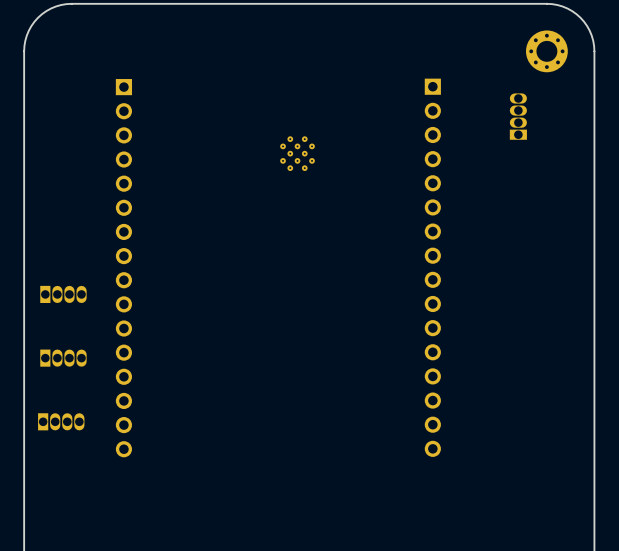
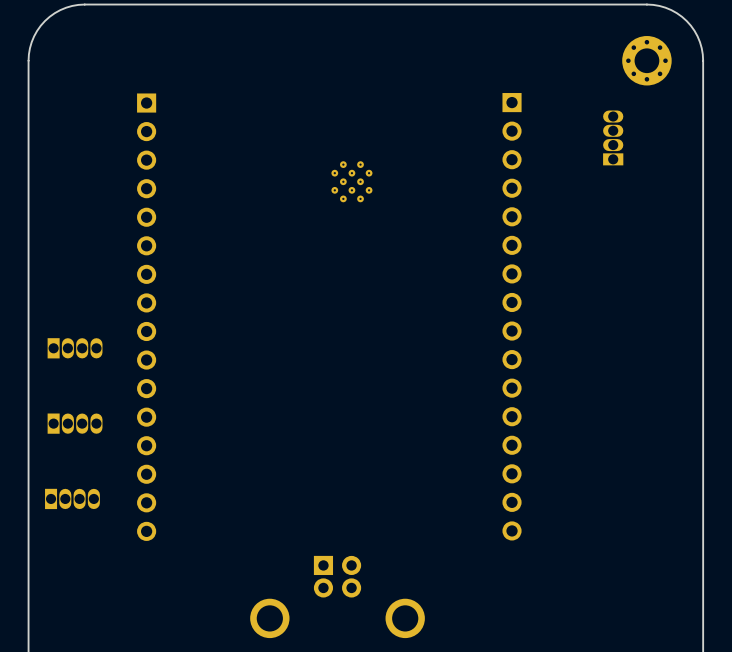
part: none -> (337, 596)

